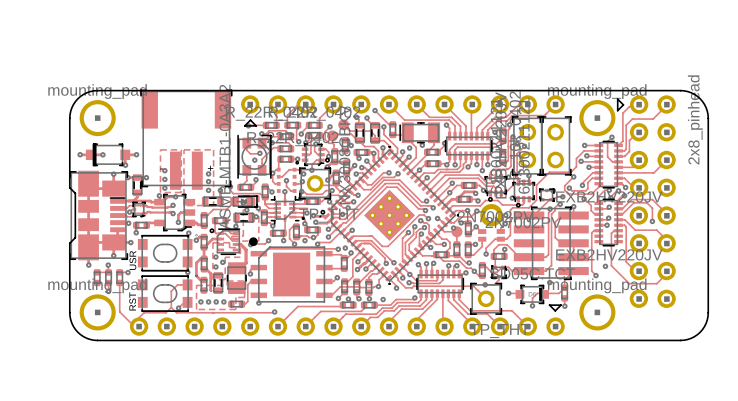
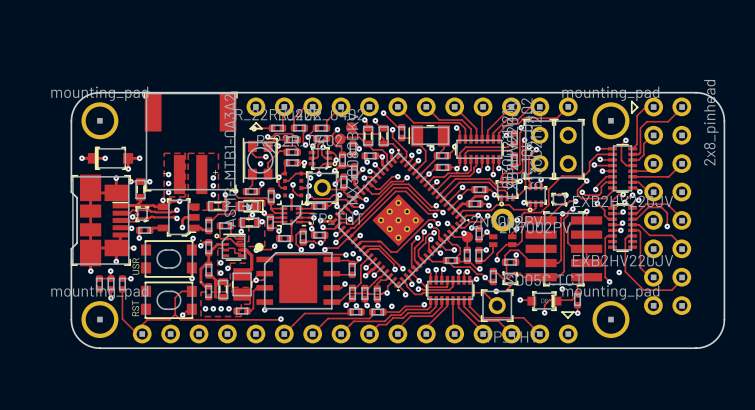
track: none -> (264, 273) (262, 280) (254, 280) (251, 282)

